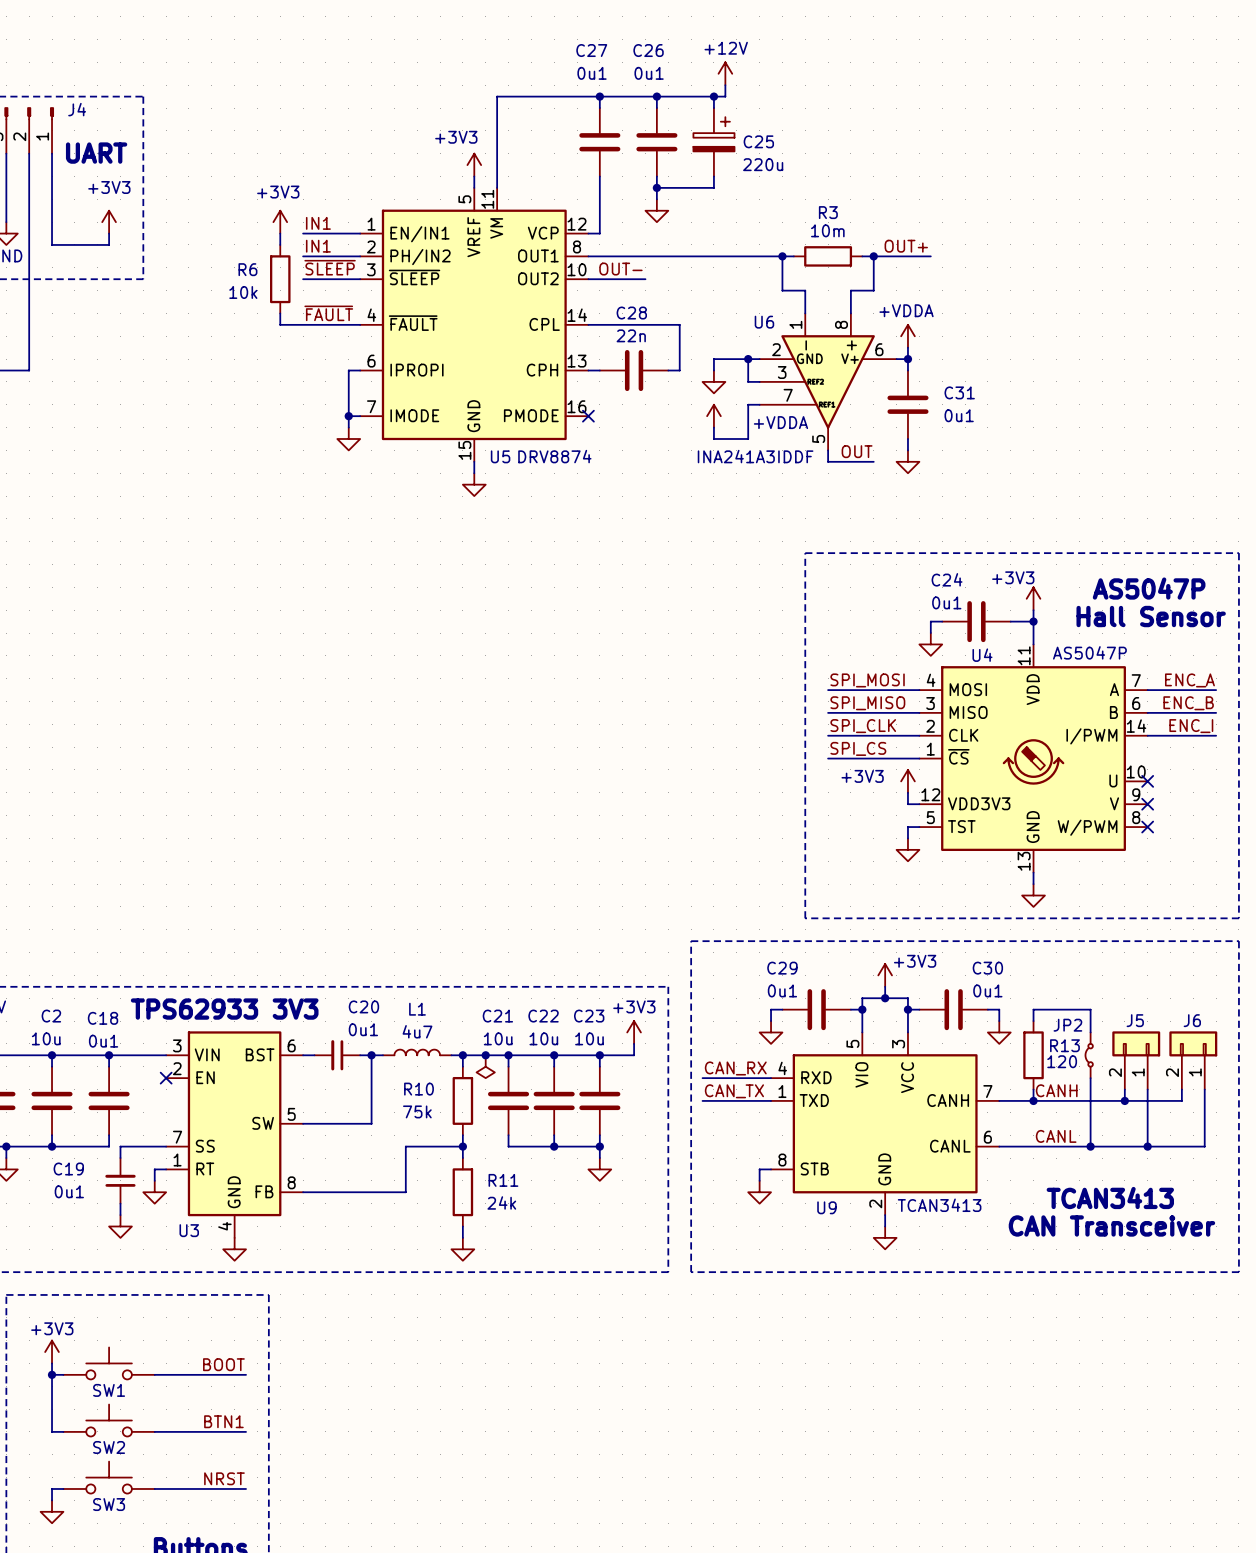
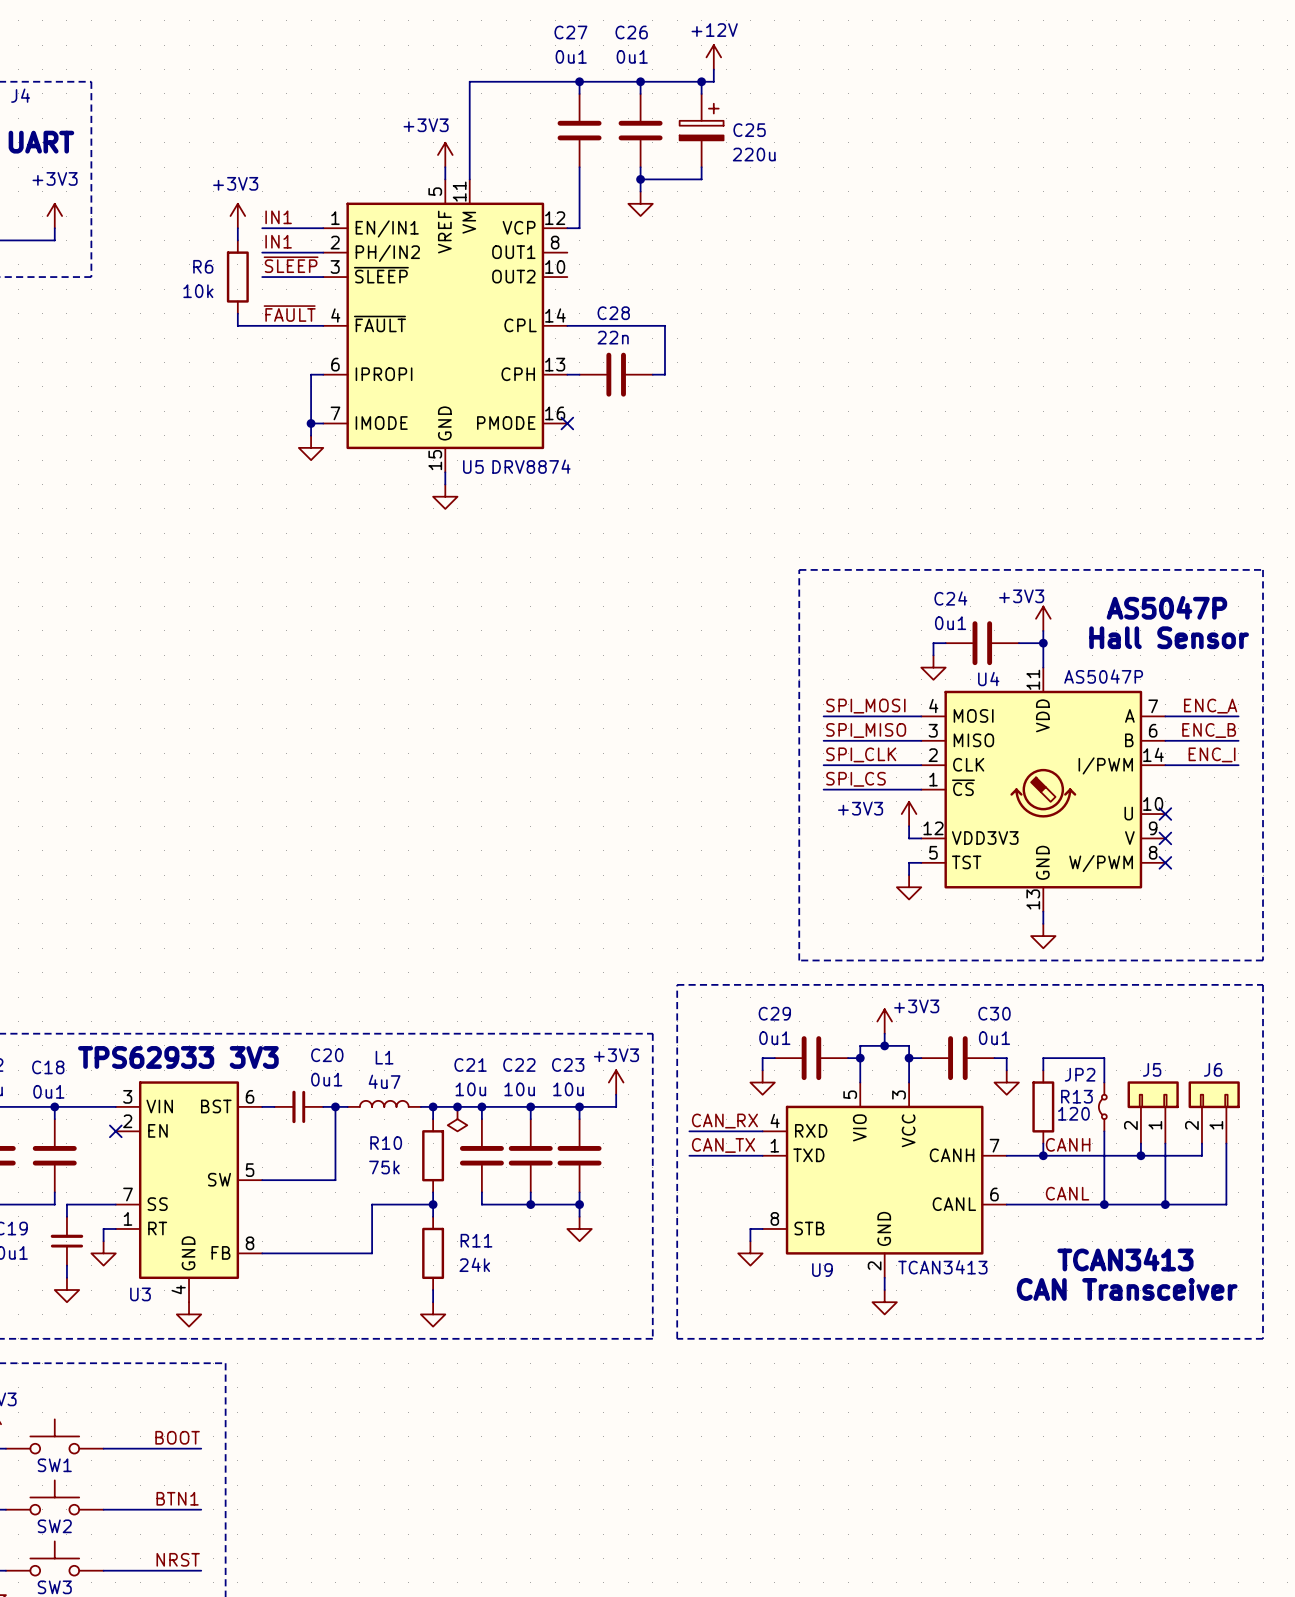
label: OUT+ (906, 246) -> none
wire: (588, 256) (793, 256) -> none
wire: (782, 256) (782, 290) (805, 290) (805, 313) -> none
junction: (782, 256) -> none
R3: 10m (828, 256) -> none
wire: (862, 256) (930, 256) -> none
wire: (873, 256) (873, 290) (850, 290) (850, 313) -> none
junction: (873, 256) -> none
label: OUT- (620, 269) -> none
wire: (588, 279) (645, 279) -> none
power symbol: +VDDA (907, 336) -> none
wire: (907, 347) (907, 370) -> none
wire: (748, 359) (748, 381) (759, 381) -> none
junction: (748, 359) -> none
wire: (759, 359) (713, 359) (713, 370) -> none
wire: (896, 359) (907, 359) -> none
junction: (907, 359) -> none
power symbol: (713, 381) -> none
U6: INA241A3IDDF (828, 381) -> none
wire: (759, 404) (748, 404) (748, 438) (713, 438) (713, 427) -> none
C31: 0u1 (907, 404) -> none
power symbol: +VDDA (713, 416) -> none
wire: (907, 438) (907, 450) -> none
wire: (828, 450) (828, 461) (873, 461) -> none
label: OUT (857, 451) -> none
power symbol: (907, 461) -> none

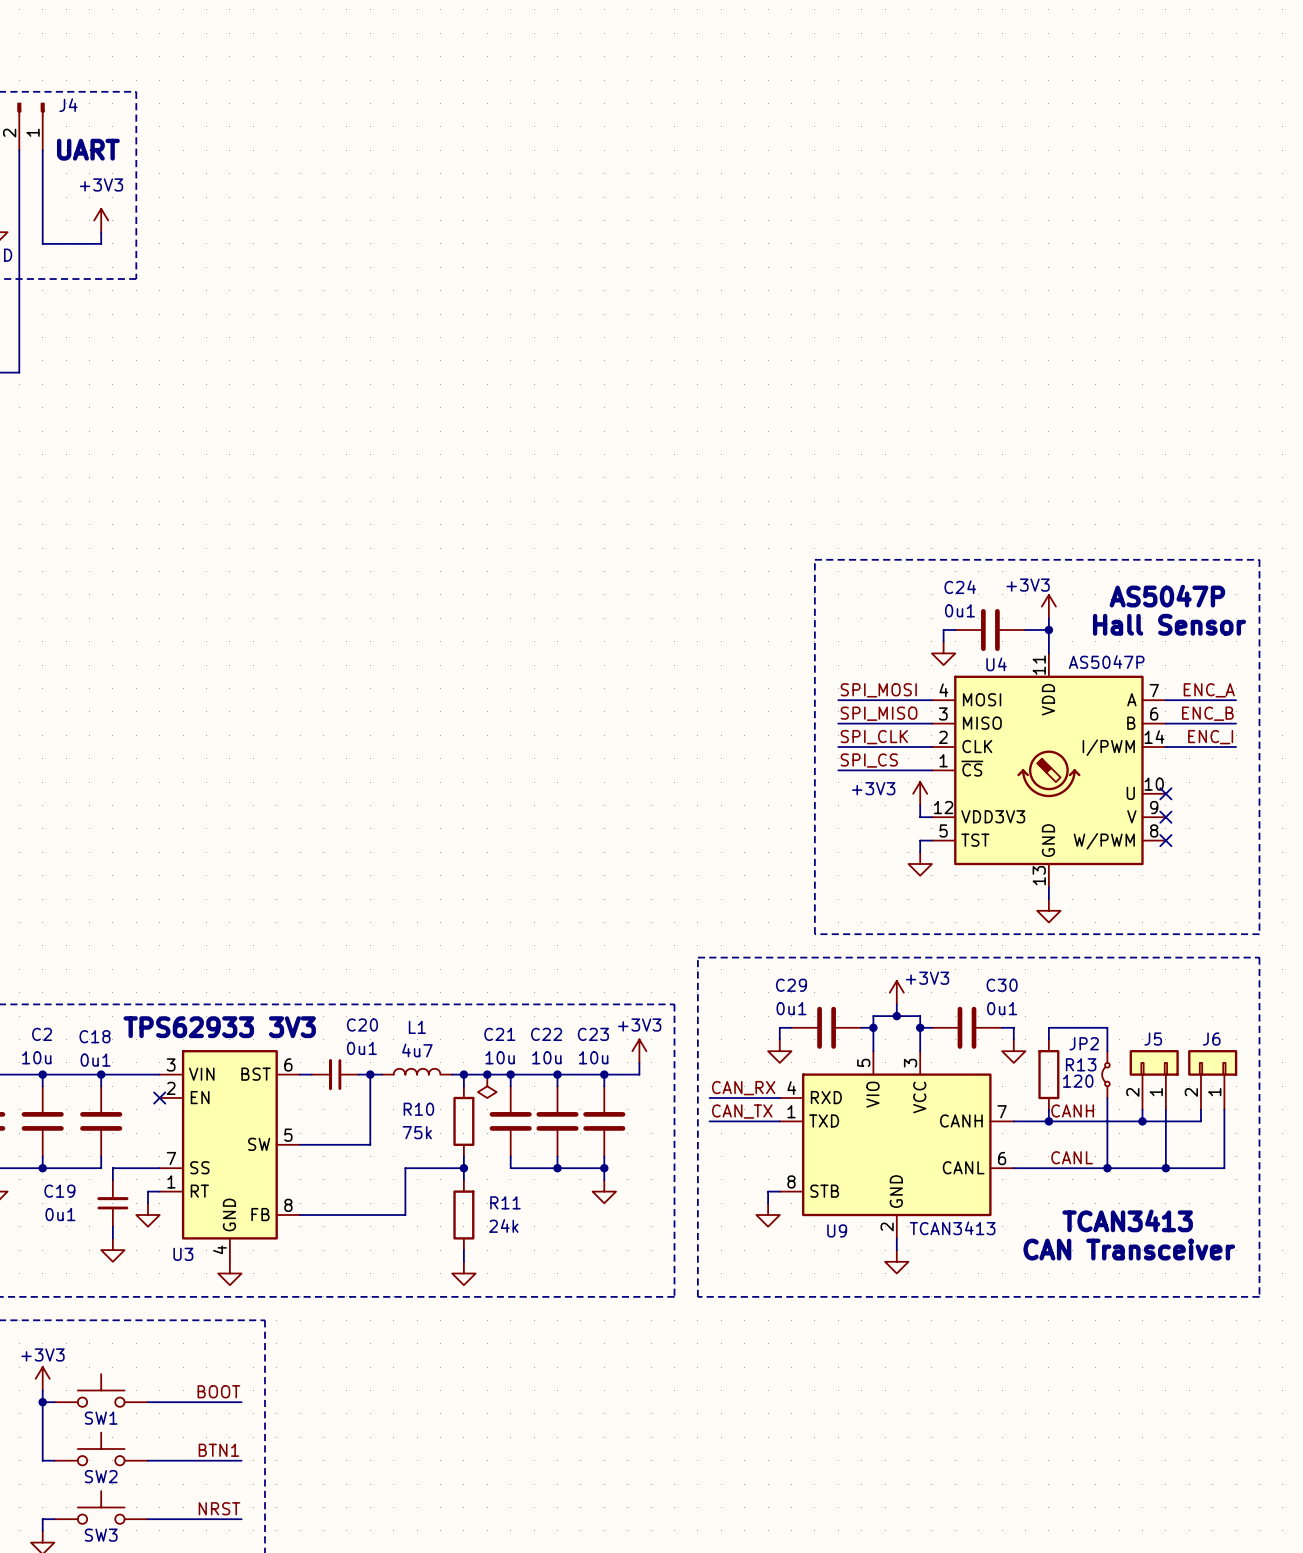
power symbol: +12V (713, 57) -> none
wire: (713, 69) (713, 81) (469, 81) (469, 179) -> none
wire: (579, 81) (579, 93) -> none
junction: (579, 81) -> none
wire: (640, 81) (640, 93) -> none
junction: (640, 81) -> none
wire: (701, 81) (701, 93) -> none
junction: (701, 81) -> none
C27: 0u1 (579, 130) -> none
C26: 0u1 (640, 130) -> none
C25: 220u (701, 130) -> none
power symbol: +3V3 (445, 154) -> none
wire: (445, 167) (445, 179) -> none
wire: (579, 167) (579, 228) (567, 228) -> none
wire: (640, 167) (640, 191) -> none
wire: (701, 167) (701, 179) (640, 179) -> none
junction: (640, 179) -> none
power symbol: (640, 203) -> none
power symbol: +3V3 (237, 216) -> none
label: IN1 (278, 217) -> none
wire: (237, 228) (237, 240) -> none
wire: (262, 228) (323, 228) -> none
label: IN1 (278, 241) -> none
wire: (262, 252) (323, 252) -> none
label: ~{SLEEP} (291, 264) -> none
R6: 10k (237, 277) -> none
wire: (262, 277) (323, 277) -> none
wire: (237, 313) (237, 325) (323, 325) -> none
label: ~{FAULT} (289, 313) -> none
U5: DRV8874 (445, 325) -> none
wire: (567, 325) (664, 325) (664, 374) (652, 374) -> none
wire: (323, 374) (311, 374) (311, 435) -> none
wire: (567, 374) (579, 374) -> none
C28: 22n (616, 374) -> none
wire: (311, 423) (323, 423) -> none
junction: (311, 423) -> none
no-connect mark: (567, 423) -> none
power symbol: (311, 447) -> none
wire: (445, 472) (445, 484) -> none
power symbol: (445, 496) -> none

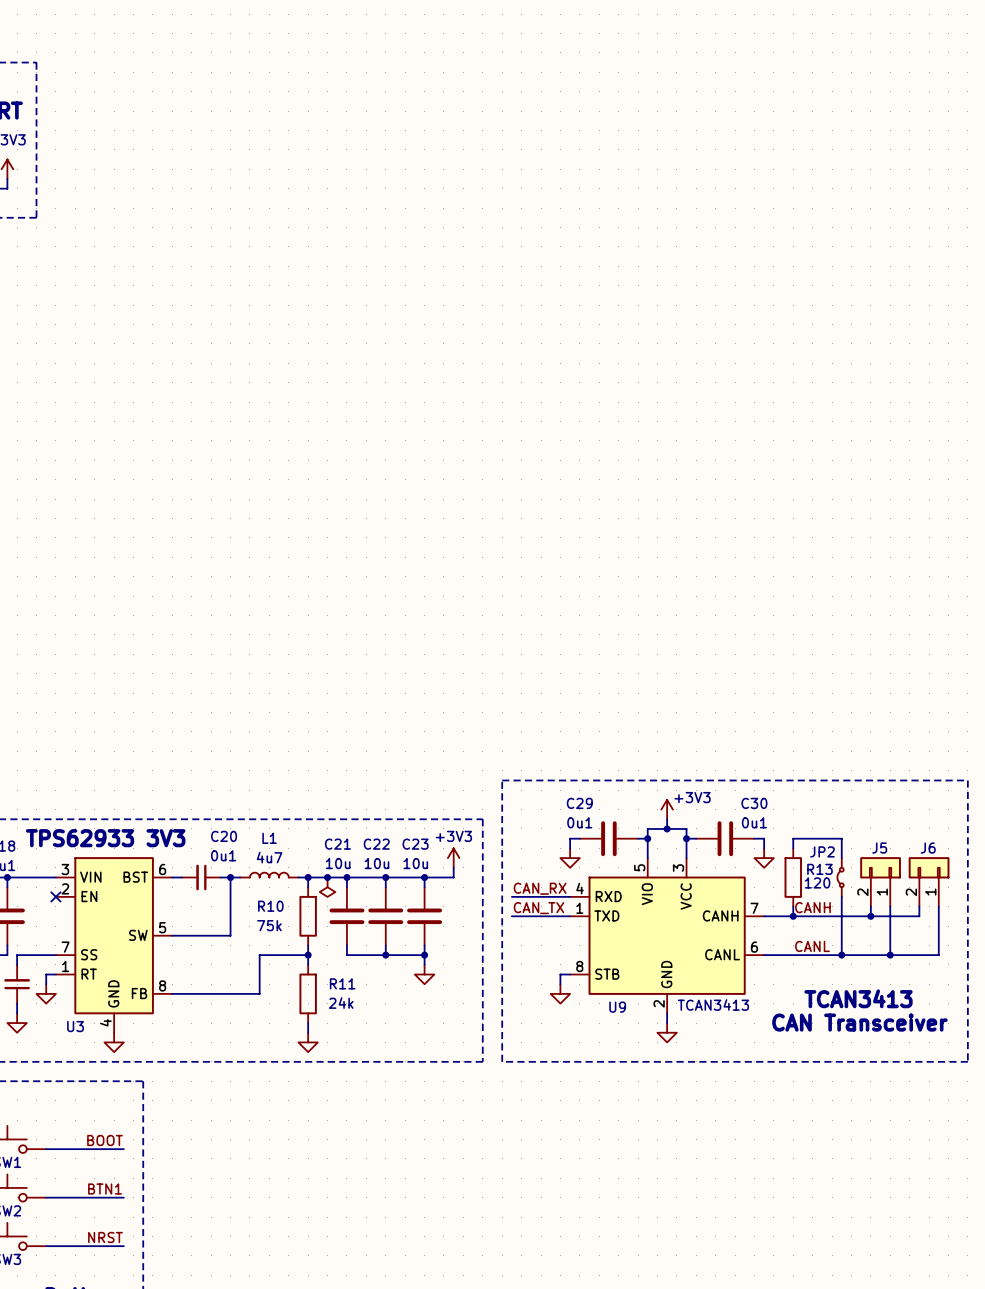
line: (814, 559) (1259, 559) (1259, 934) (814, 934) (814, 559) -> none
text: AS5047P (1167, 596) -> none
power symbol: +3V3 (1048, 606) -> none
wire: (1048, 618) (1048, 653) -> none
text: Hall Sensor (1169, 624) -> none
wire: (955, 630) (943, 630) (943, 641) -> none
C24: 0u1 (990, 630) -> none
wire: (1025, 630) (1048, 630) -> none
junction: (1048, 630) -> none
power symbol: (943, 653) -> none
label: SPI_MOSI (878, 690) -> none
label: ENC_A (1209, 690) -> none
wire: (838, 700) (931, 700) -> none
wire: (1165, 700) (1236, 700) -> none
label: SPI_MISO (879, 713) -> none
label: ENC_B (1207, 713) -> none
wire: (838, 723) (931, 723) -> none
wire: (1165, 723) (1236, 723) -> none
label: SPI_CLK (874, 737) -> none
label: ENC_I (1210, 737) -> none
wire: (838, 747) (931, 747) -> none
wire: (1165, 747) (1236, 747) -> none
label: SPI_CS (869, 760) -> none
wire: (838, 770) (931, 770) -> none
U4: AS5047P (1048, 770) -> none
power symbol: +3V3 (920, 793) -> none
no-connect mark: (1165, 793) -> none
wire: (920, 805) (920, 817) (931, 817) -> none
no-connect mark: (1165, 817) -> none
wire: (931, 840) (920, 840) (920, 852) -> none
no-connect mark: (1165, 840) -> none
power symbol: (920, 864) -> none
wire: (1048, 887) (1048, 899) -> none
power symbol: (1048, 910) -> none

